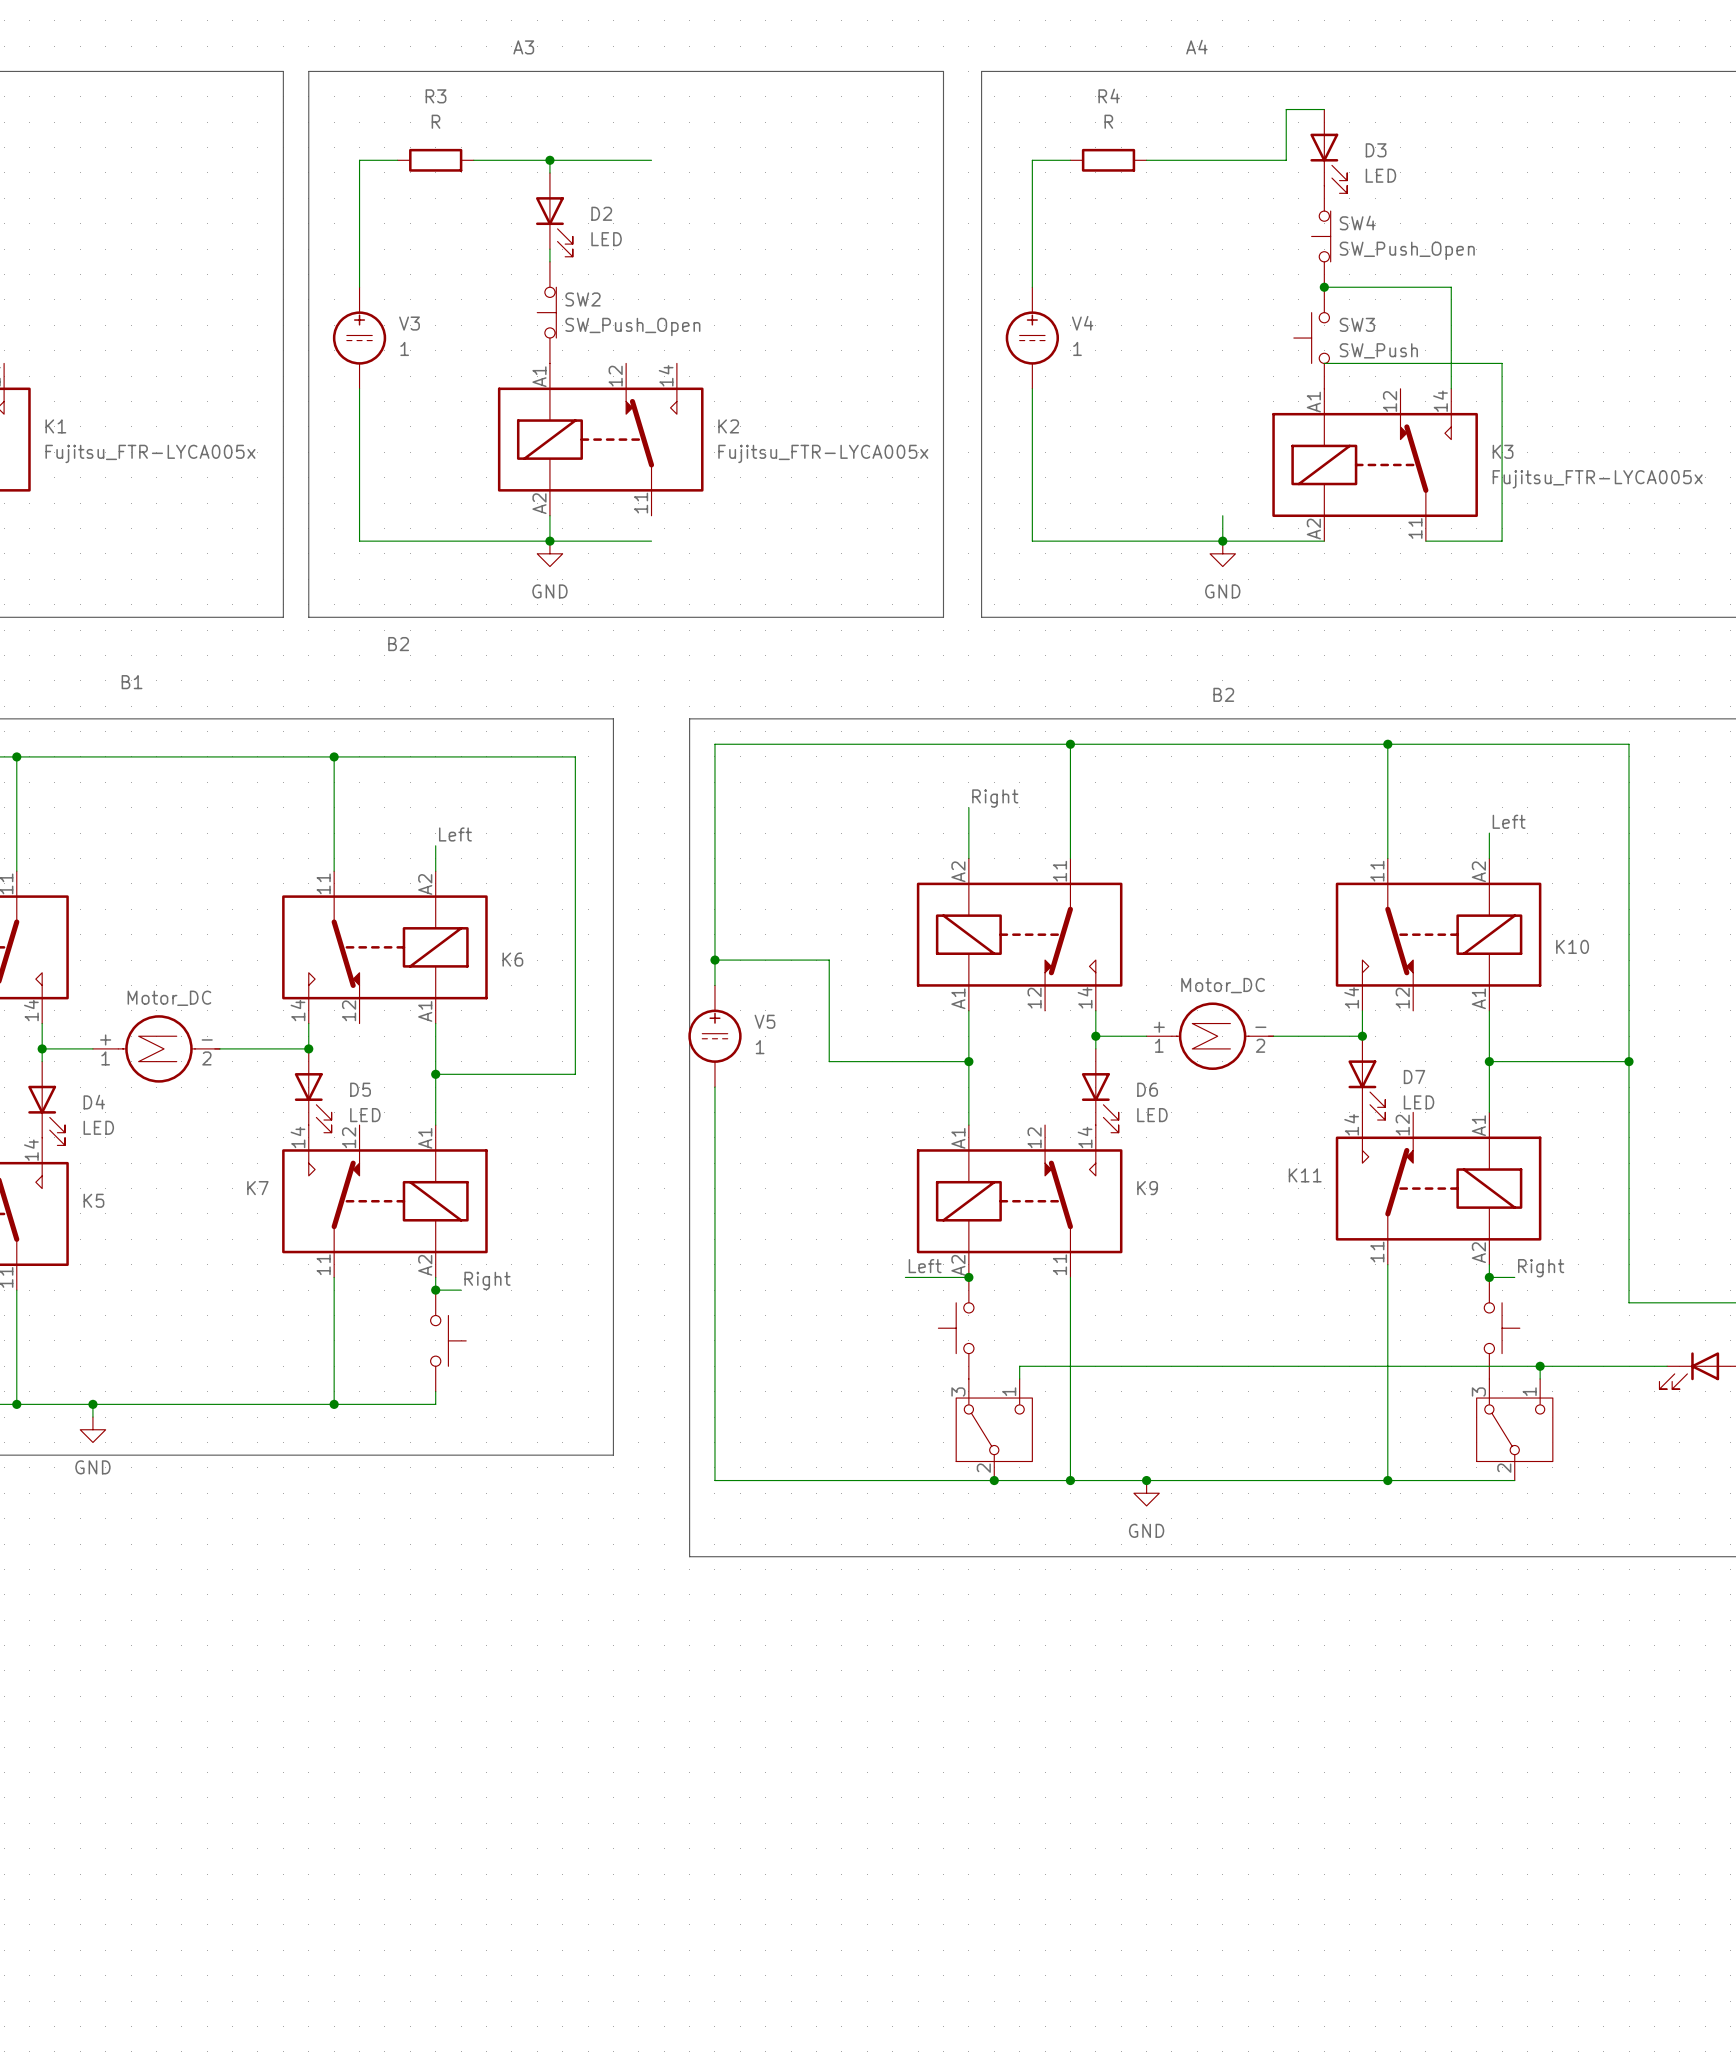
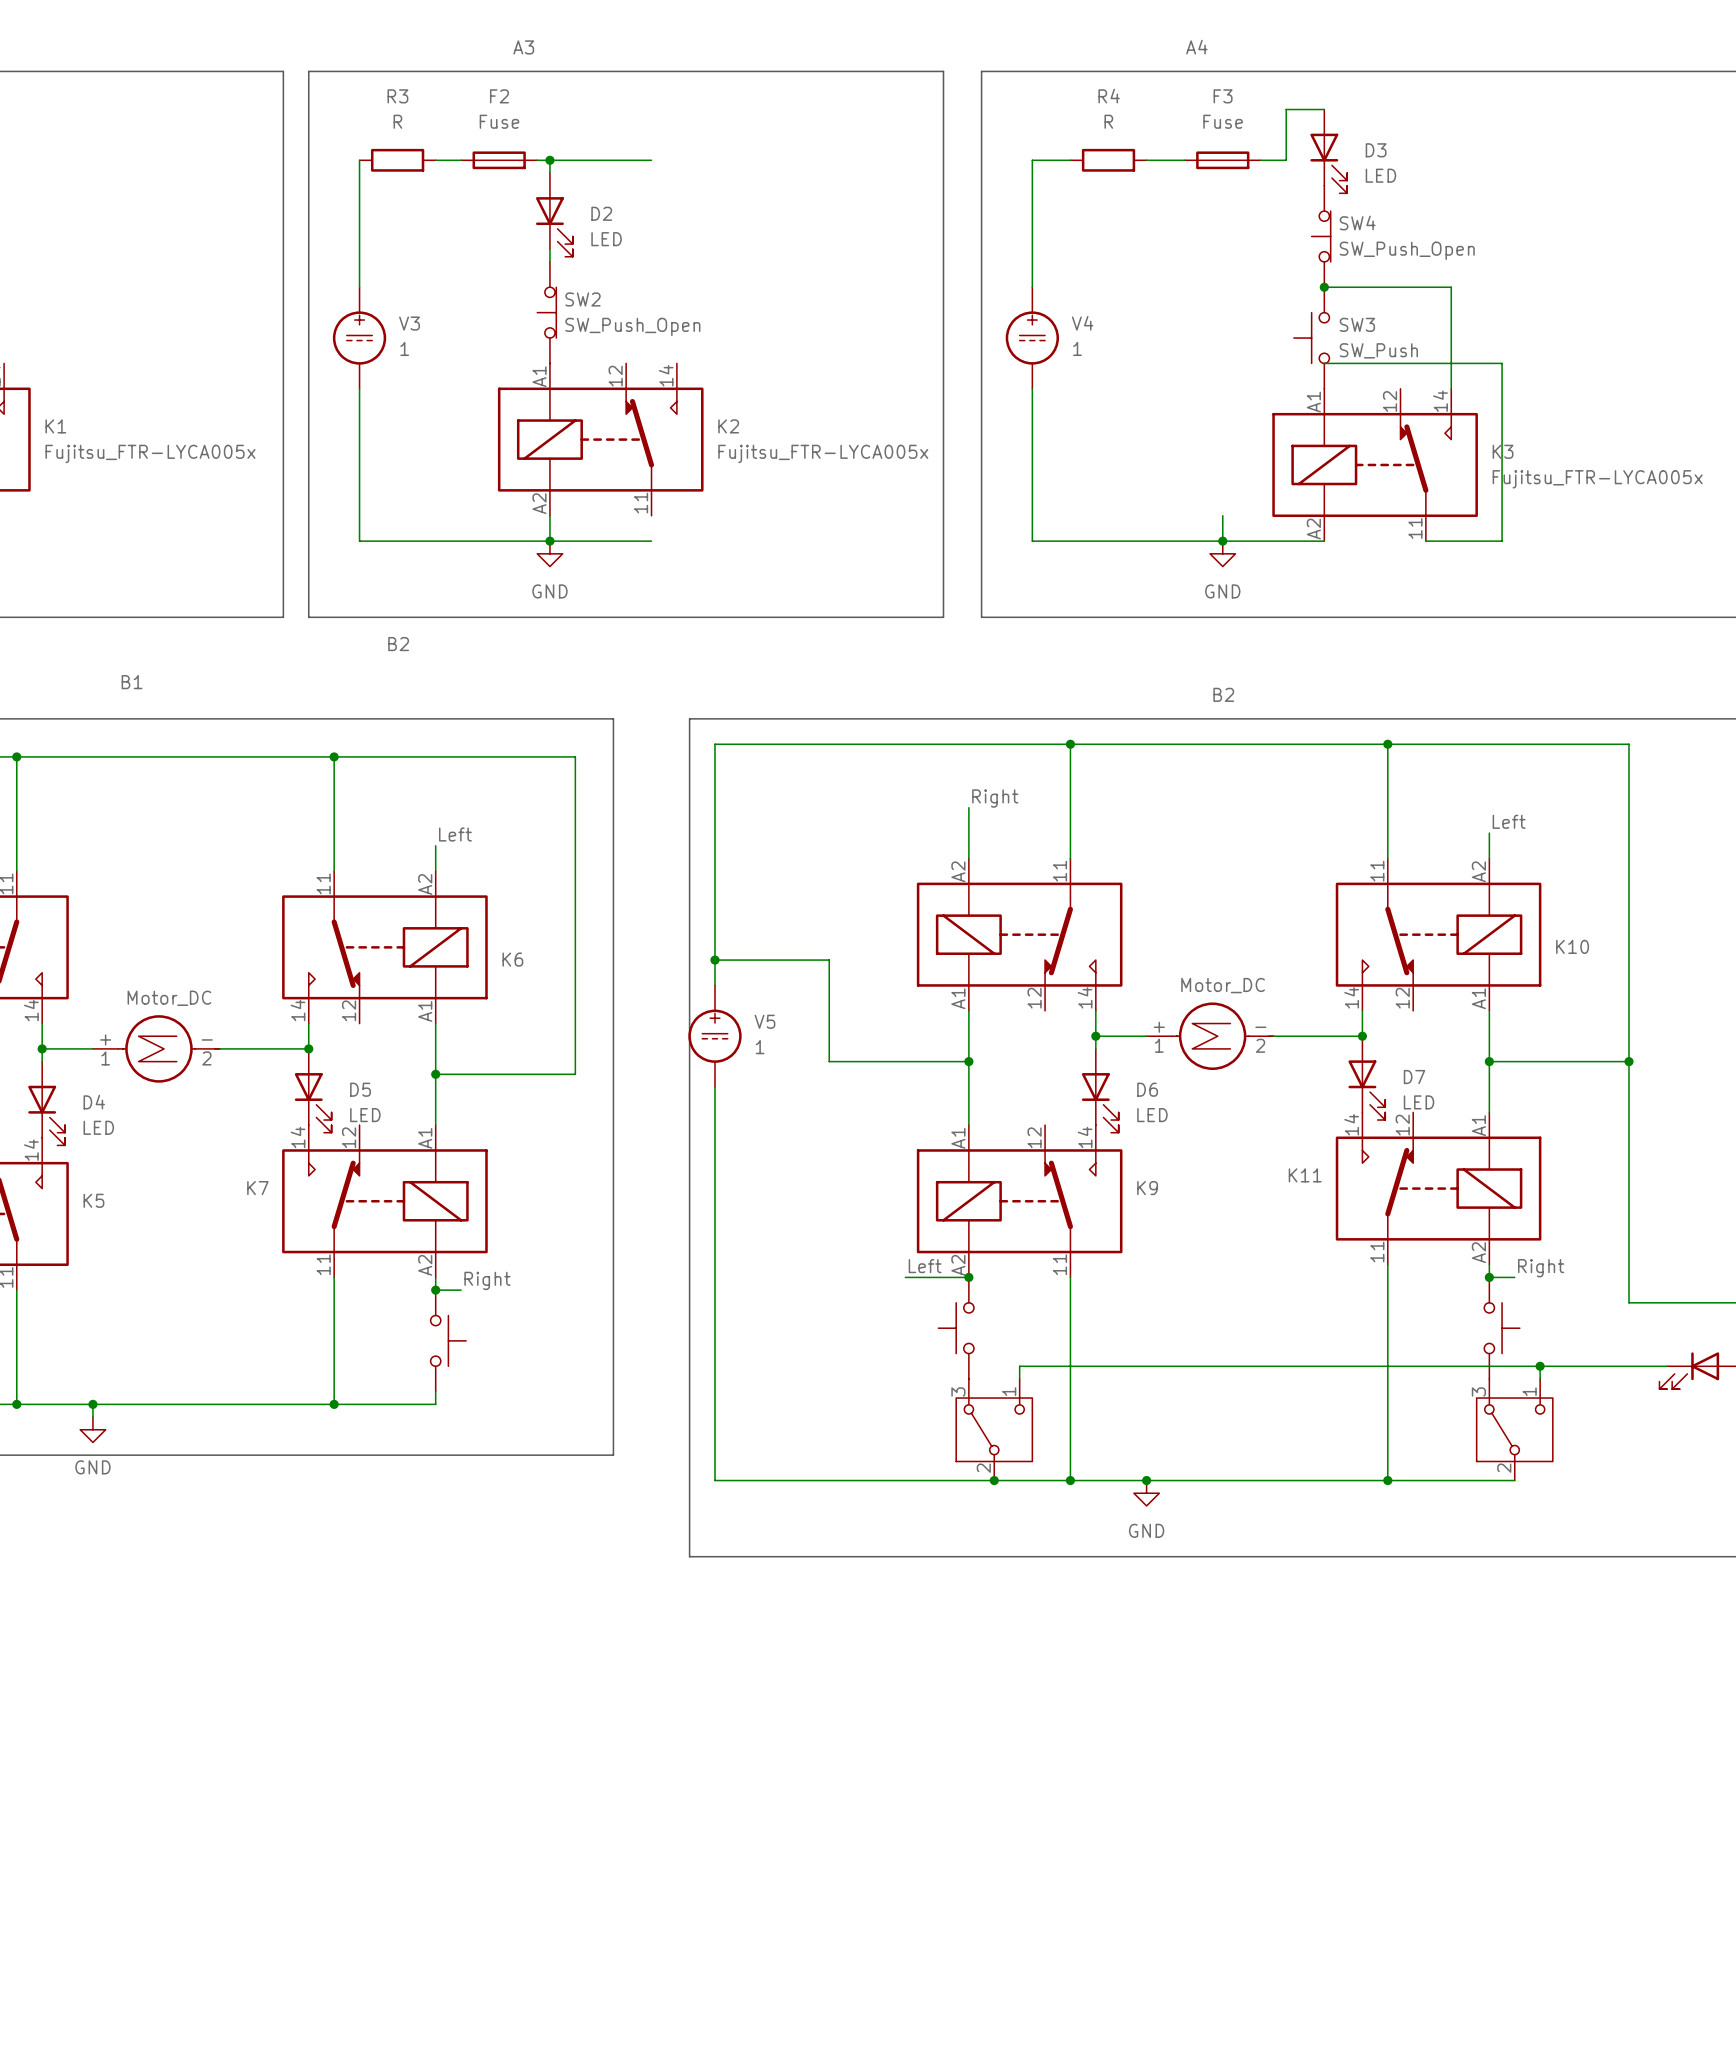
wire: (359, 160) (397, 160) -> none
wire: none -> (435, 160) (461, 160)
R3 position: (435, 160) -> (397, 160)
F2: none -> Fuse (499, 160)
F3: none -> Fuse (1222, 160)

